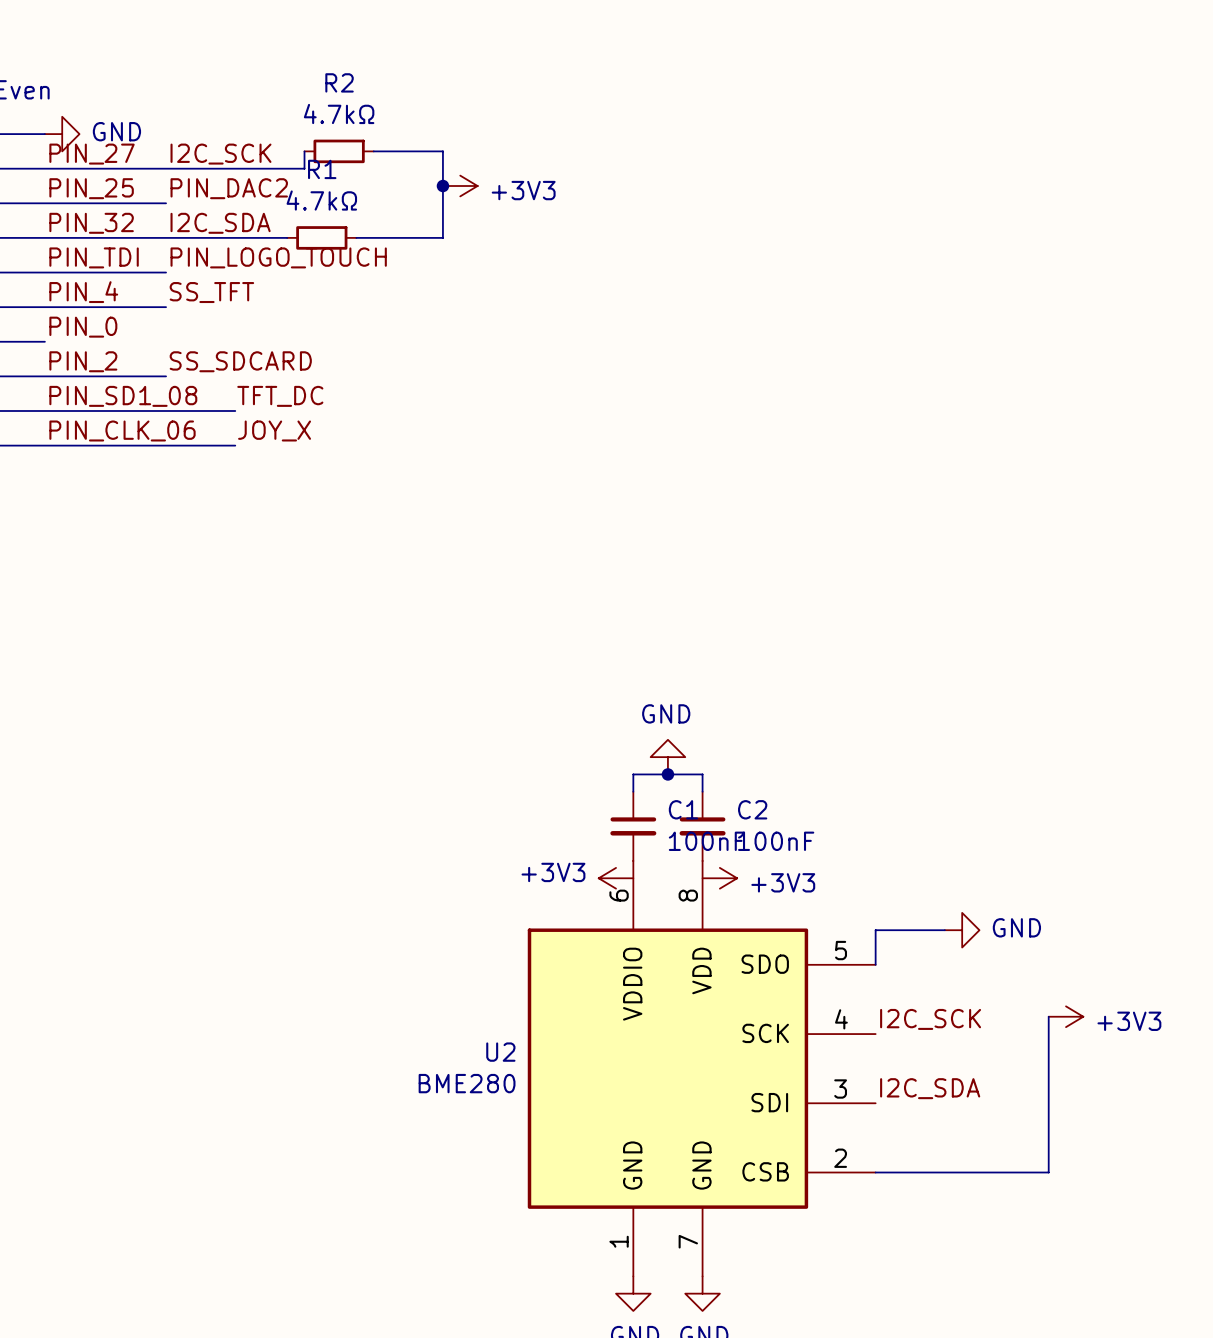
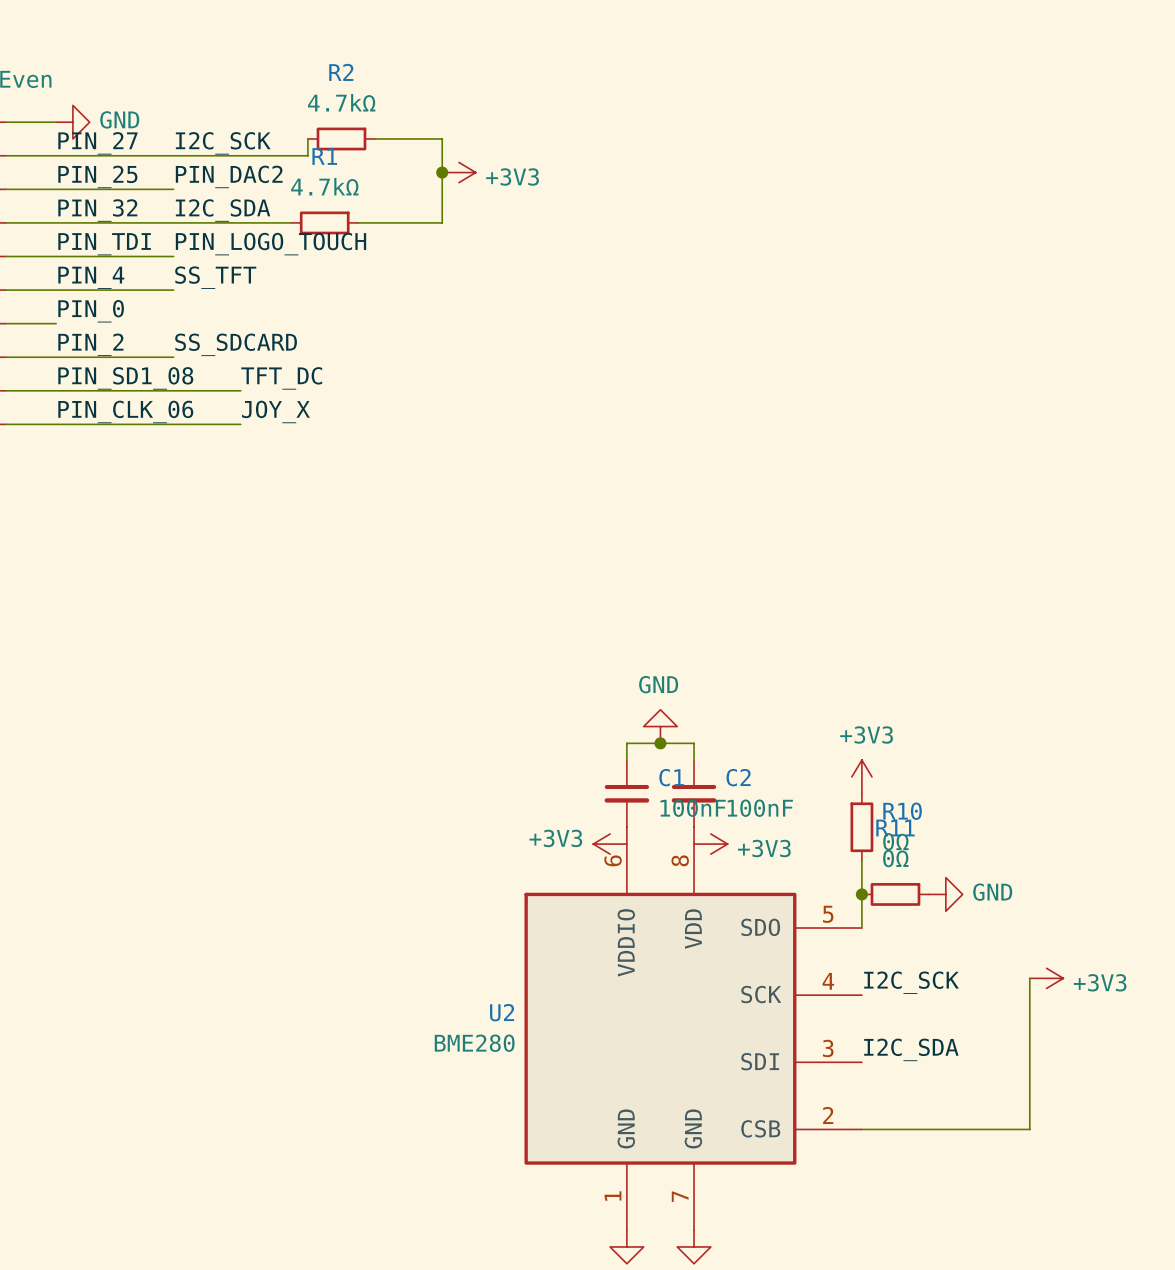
power symbol: none -> +3V3 (861, 776)
R10: none -> 0Ω (861, 827)
wire: (875, 930) (944, 930) -> (861, 894) (861, 860)
junction: none -> (861, 894)
R11: none -> 0Ω (895, 894)

